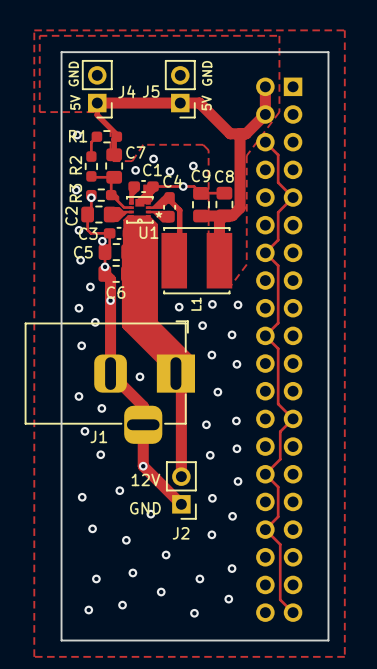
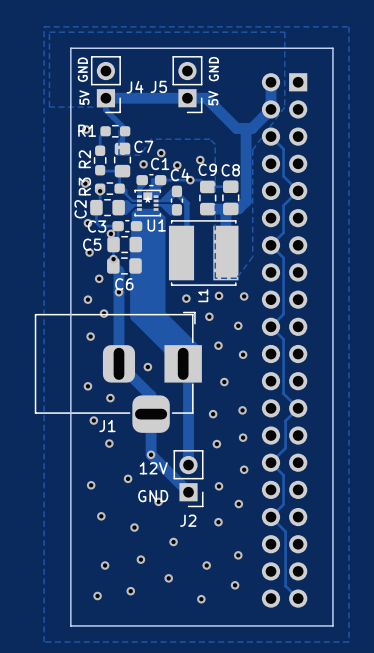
U1 footprint: [126, 196, 154, 224] -> [134, 189, 162, 217]

